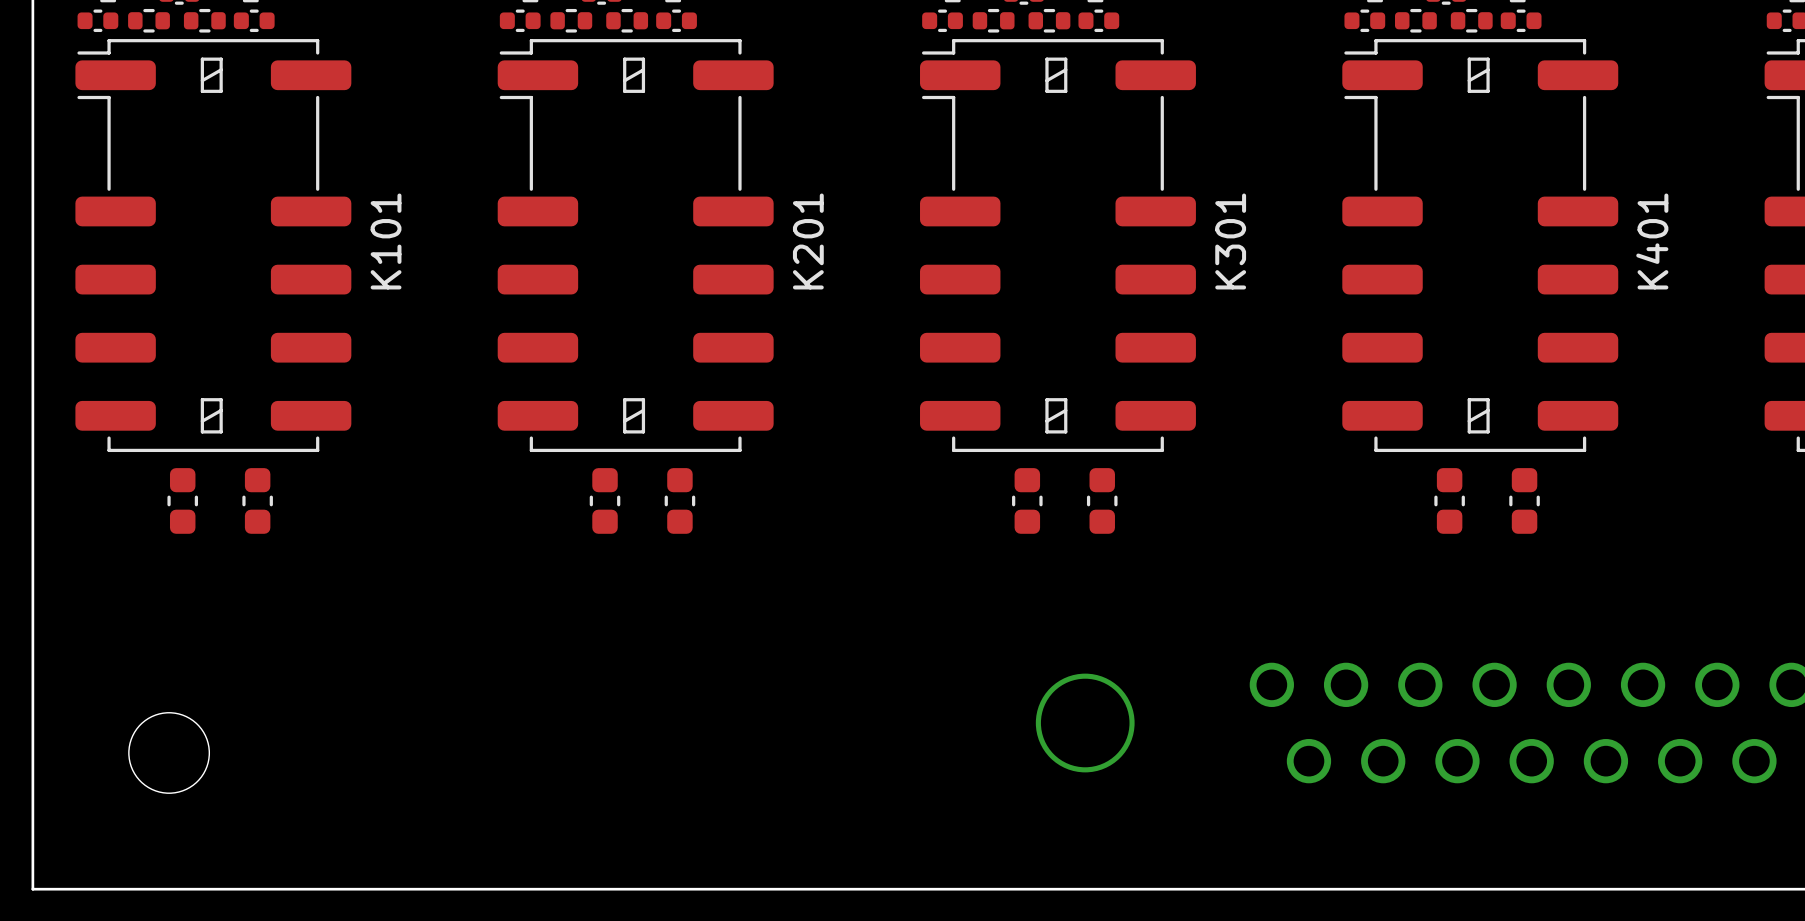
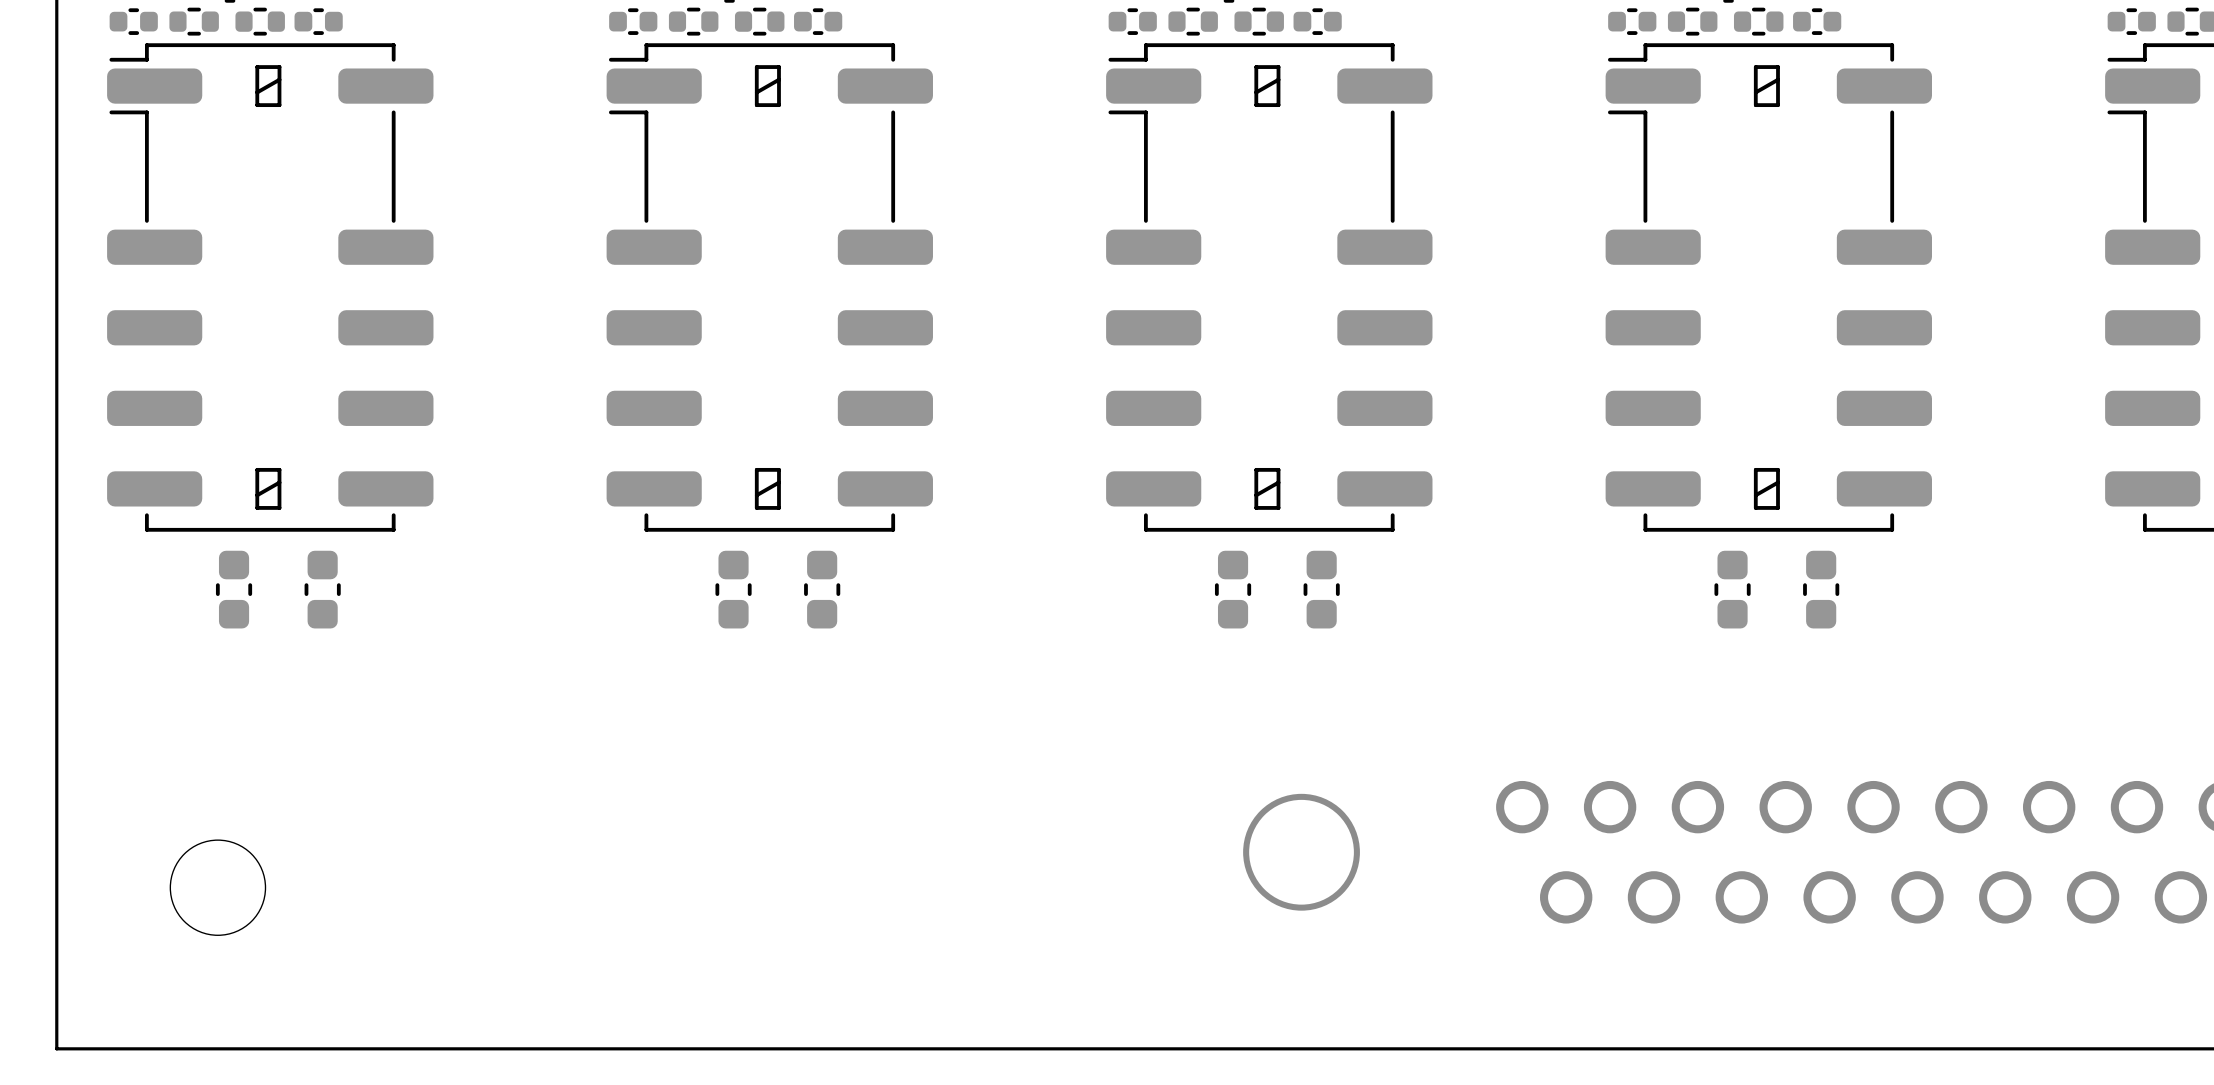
K101 name: K101 (386, 241) -> none
K201 name: K201 (808, 241) -> none
K301 name: K301 (1230, 241) -> none
K401 name: K401 (1652, 241) -> none

